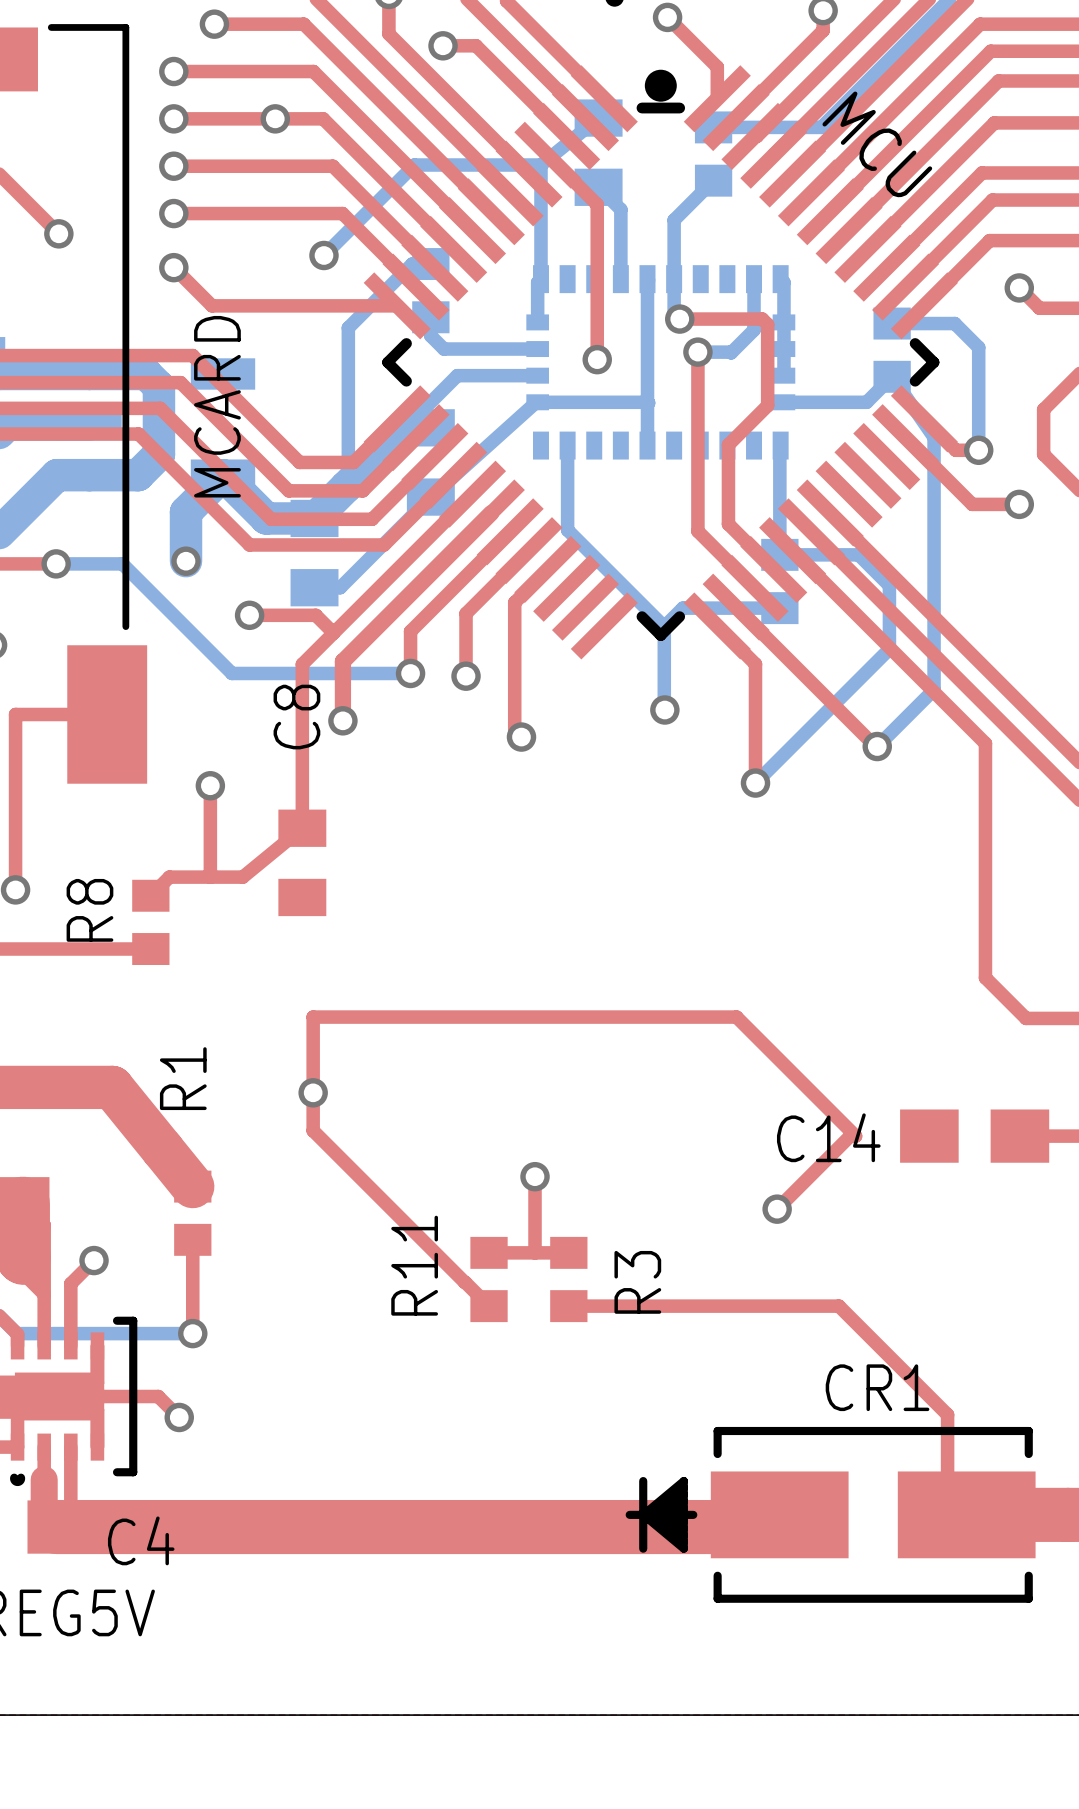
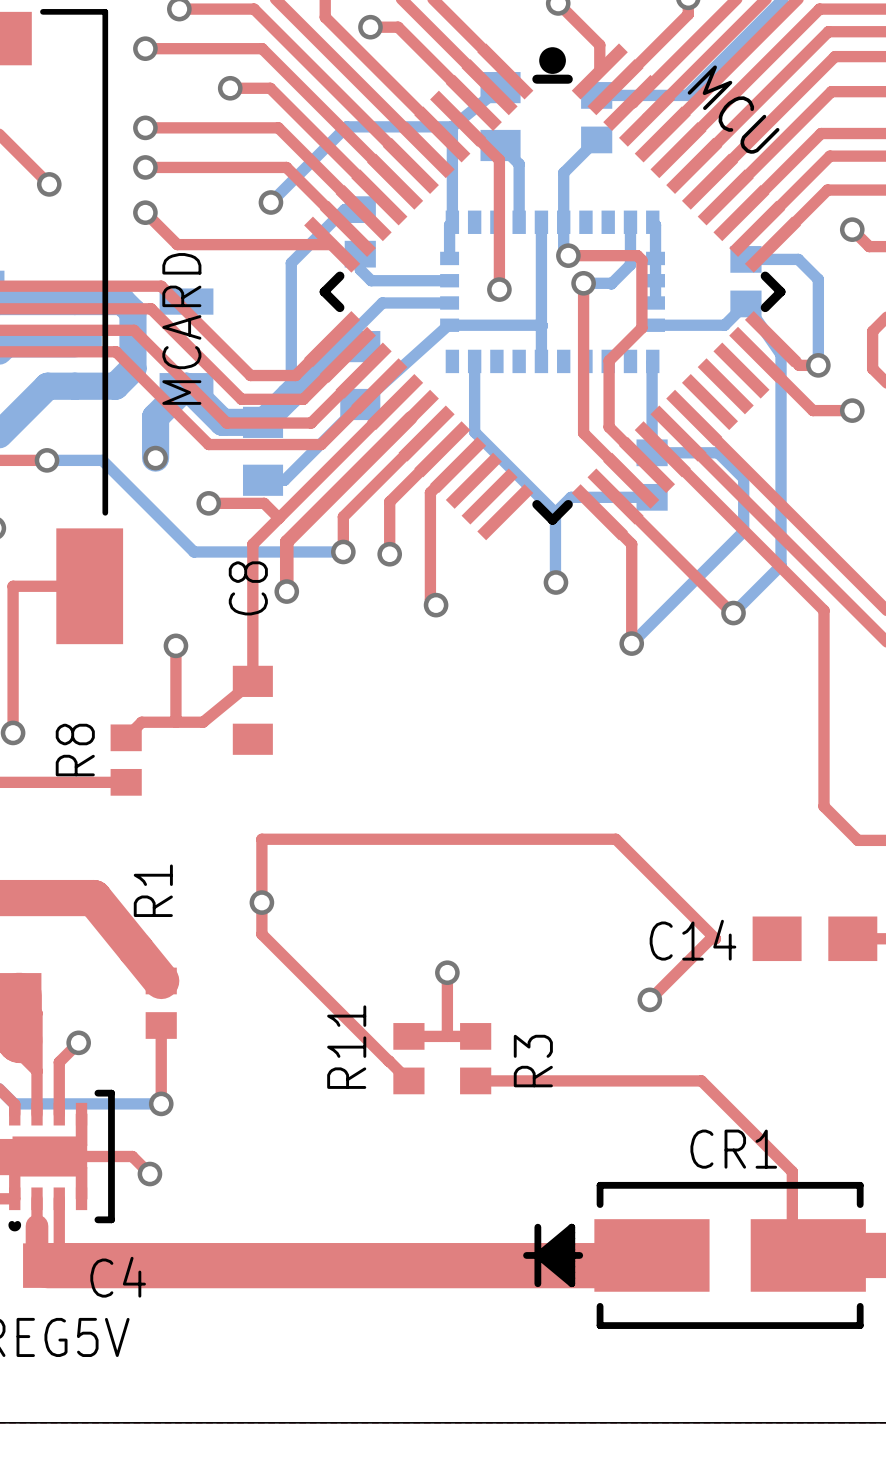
top track: (173, 118) (275, 118) -> none
via: (173, 118) -> none

